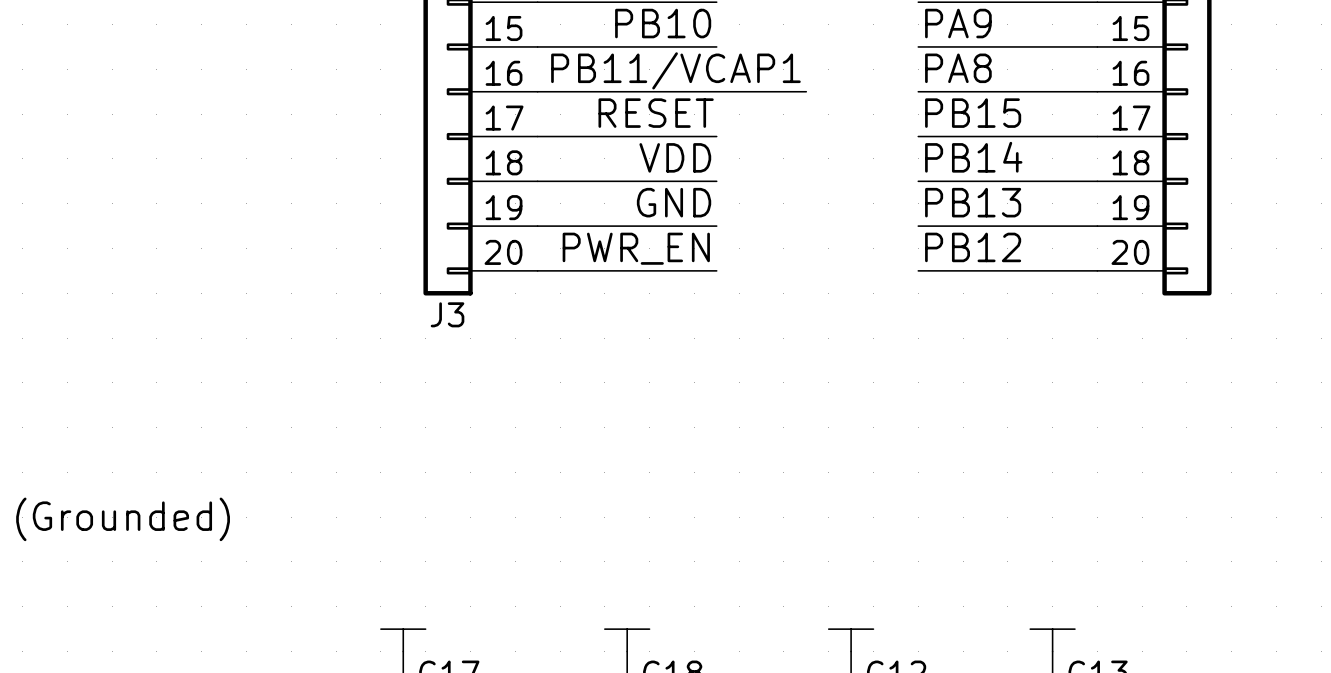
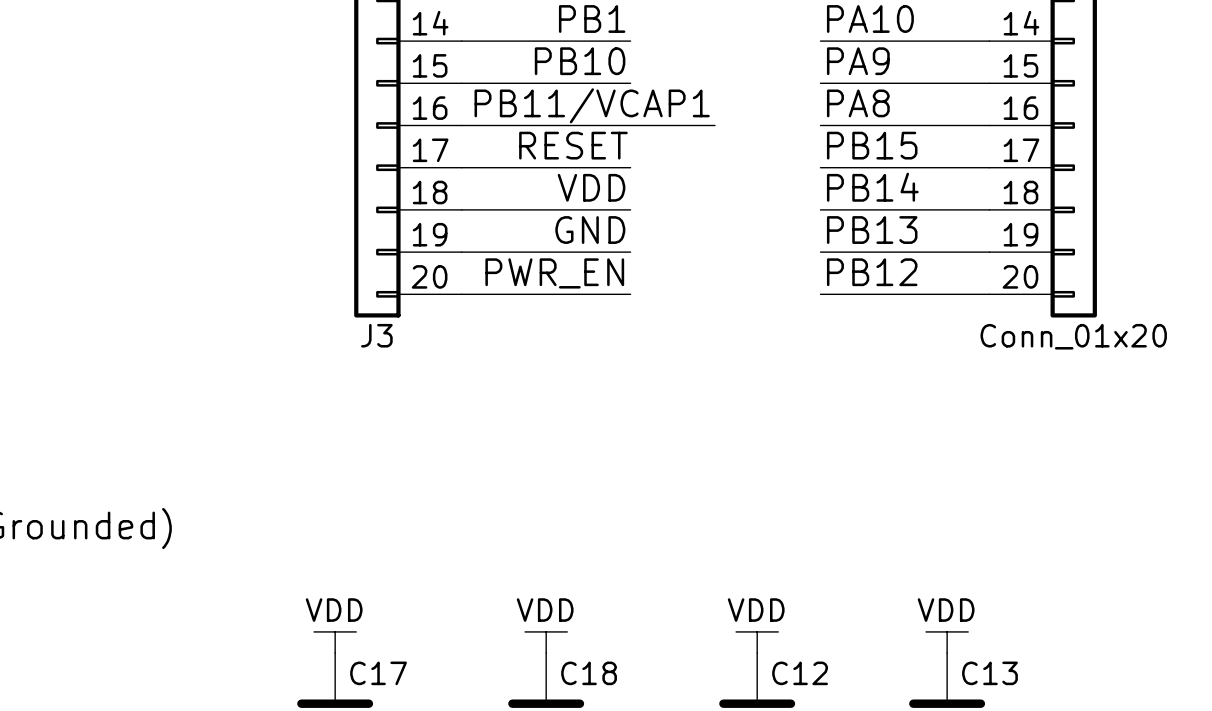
part value: none -> Conn_01x20 (1073, 336)
power symbol text: none -> VDD (334, 610)
power symbol text: none -> VDD (545, 610)
power symbol text: none -> VDD (756, 610)
power symbol text: none -> VDD (946, 610)

